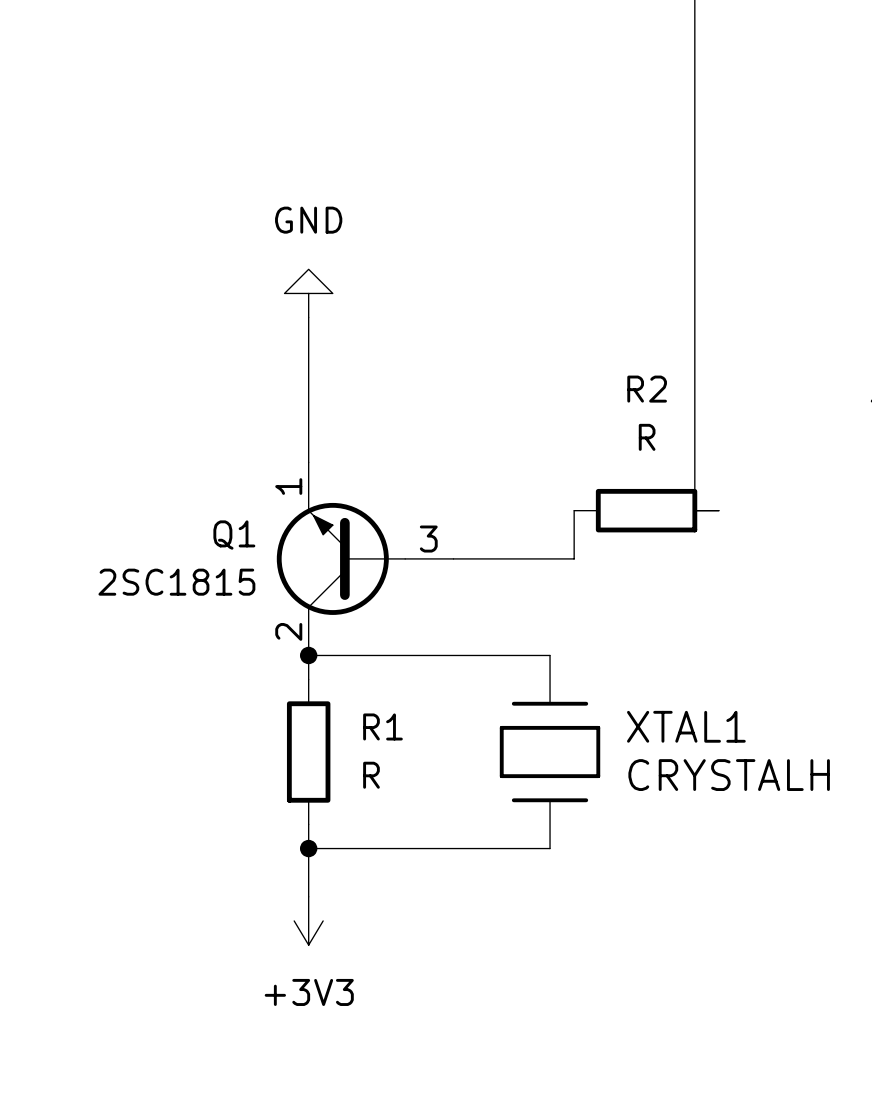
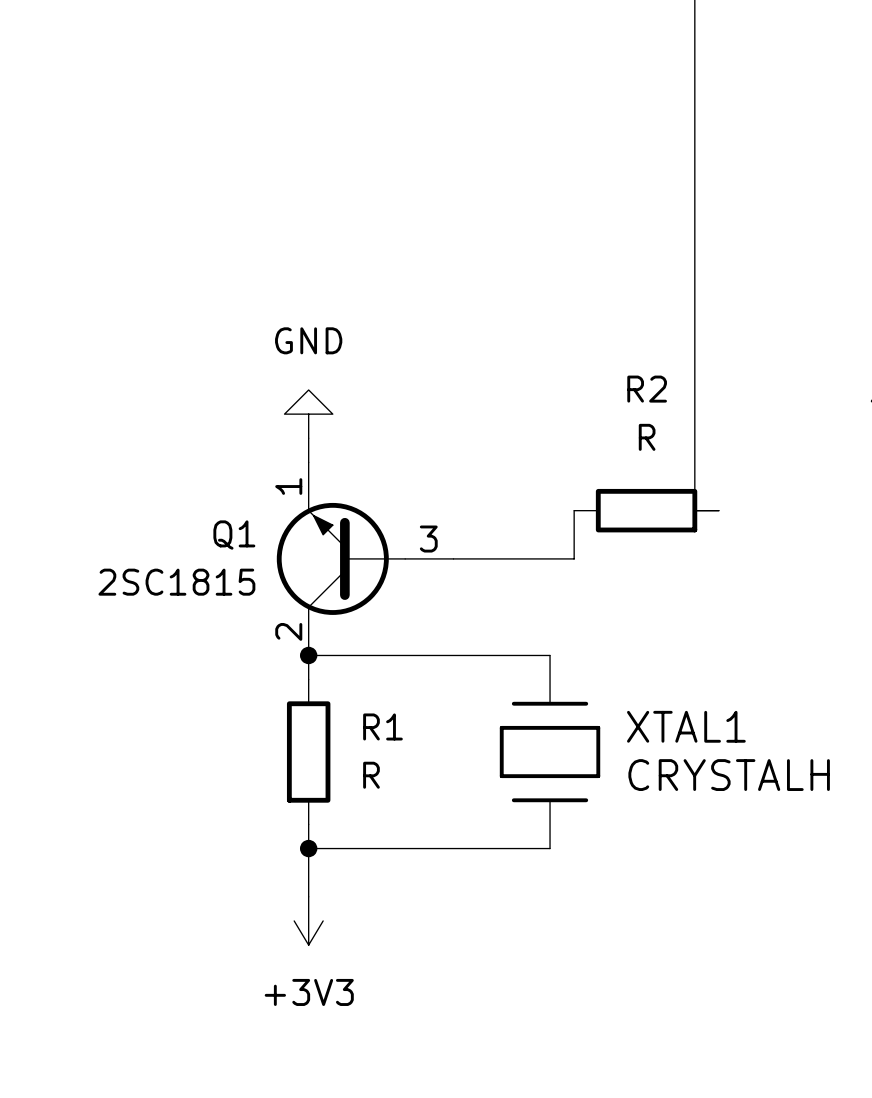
power symbol position: GND (308, 293) -> GND (308, 414)
wire: (308, 317) (308, 438) -> none

